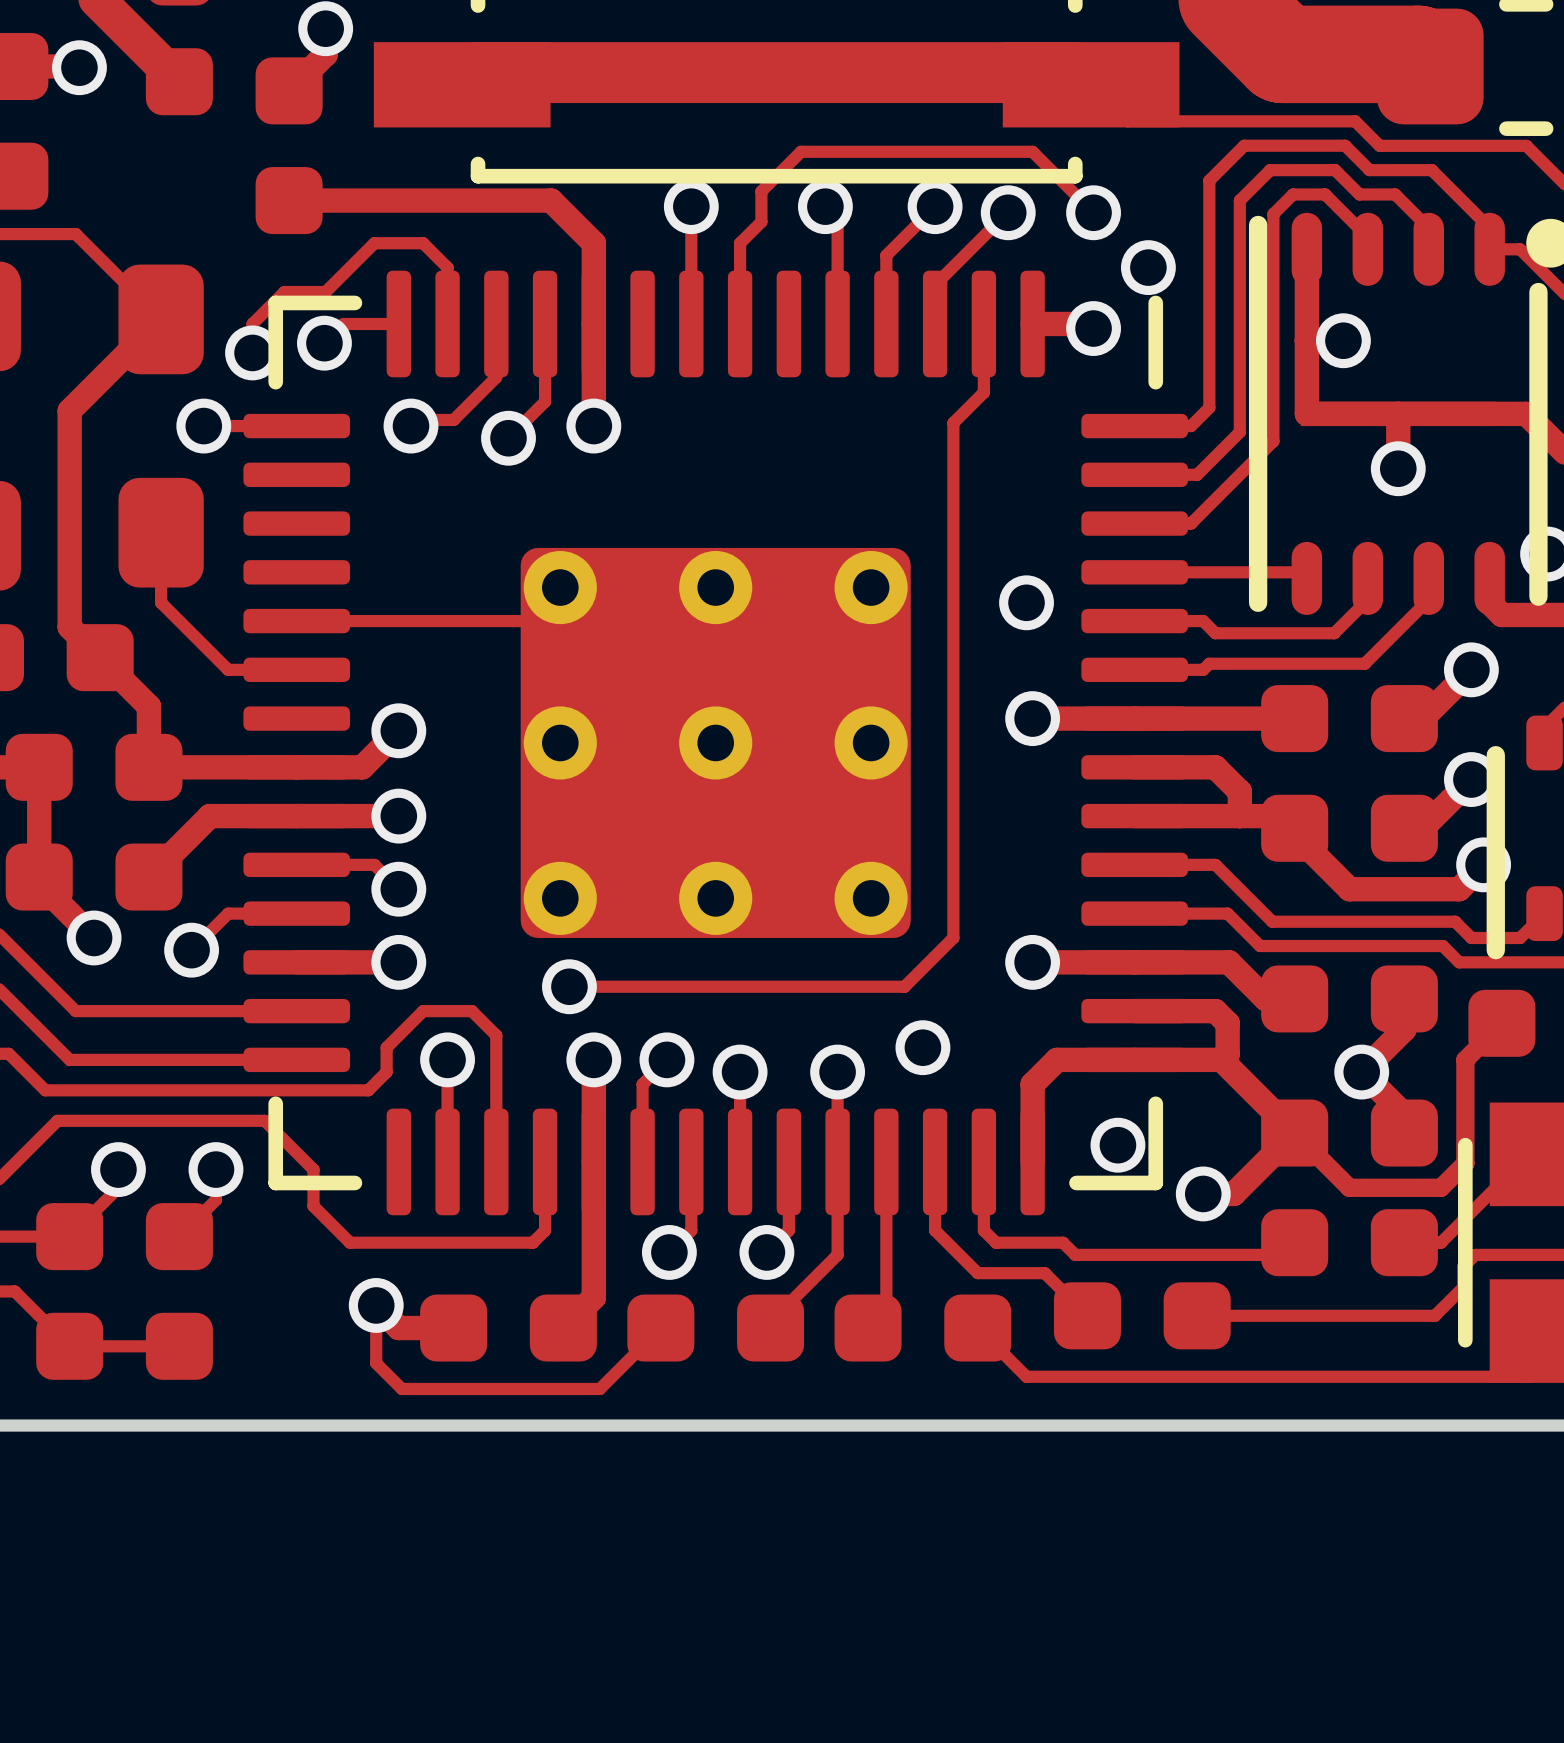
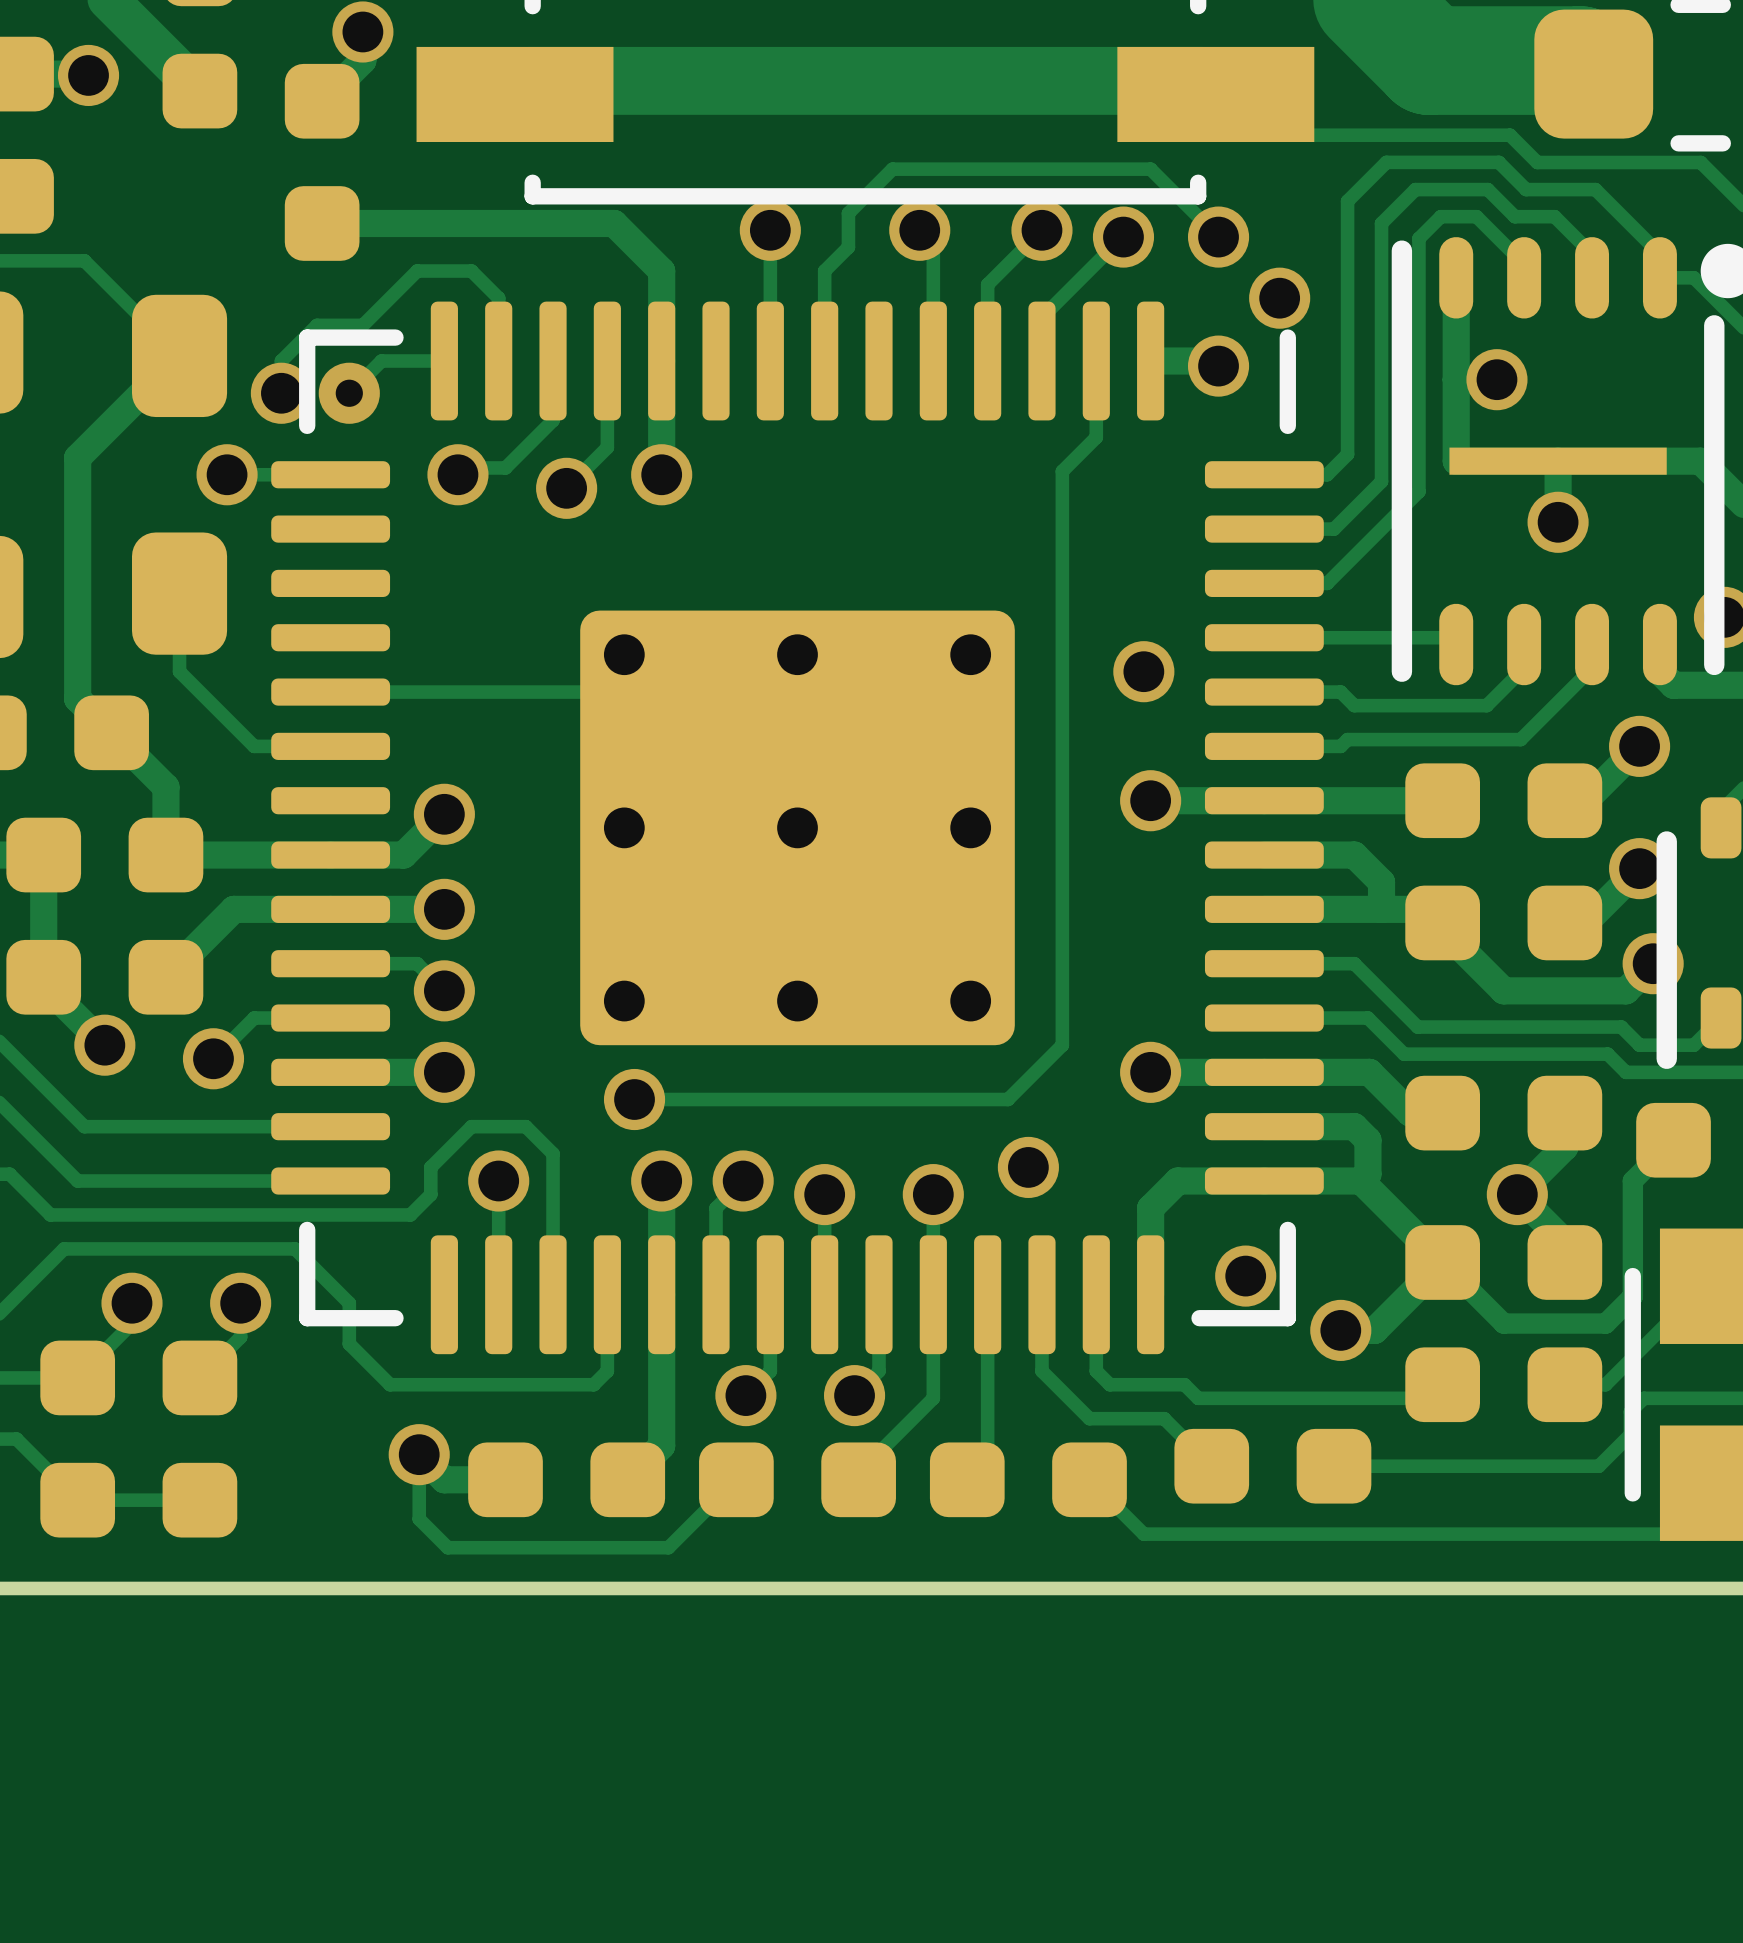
via position: (324, 343) -> (349, 393)

